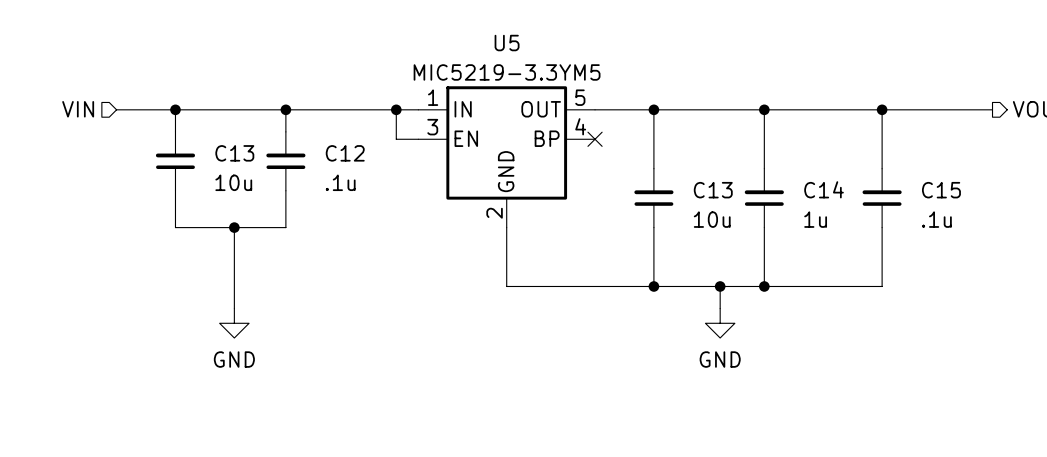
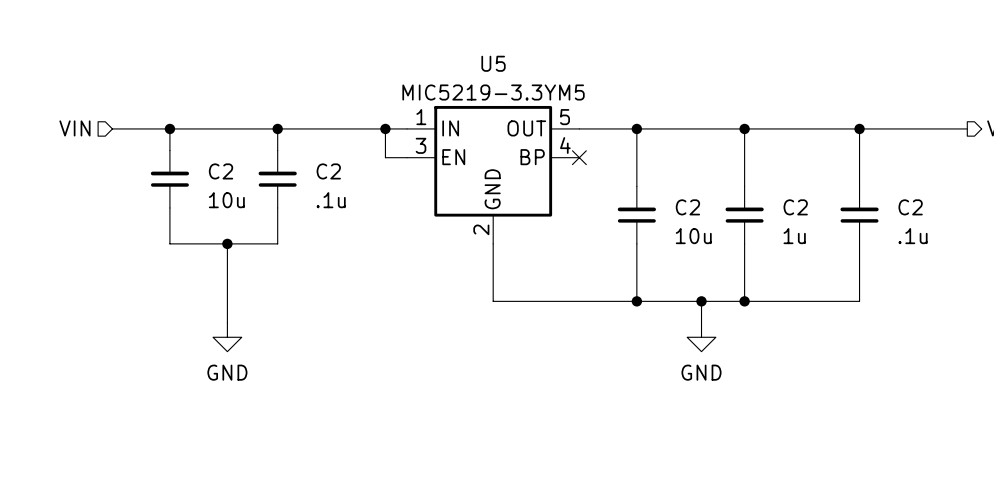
C13 name: C13 (234, 153) -> C2 (221, 171)
C12 name: C12 (345, 153) -> C2 (328, 171)
C14 name: C14 (824, 189) -> C2 (795, 207)
C13 name: C13 (713, 190) -> C2 (687, 207)
C15 name: C15 (941, 190) -> C2 (910, 207)

